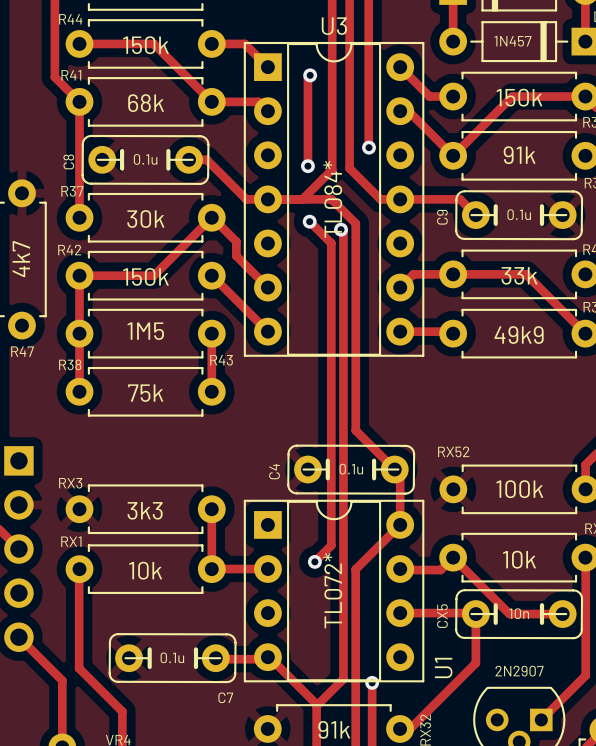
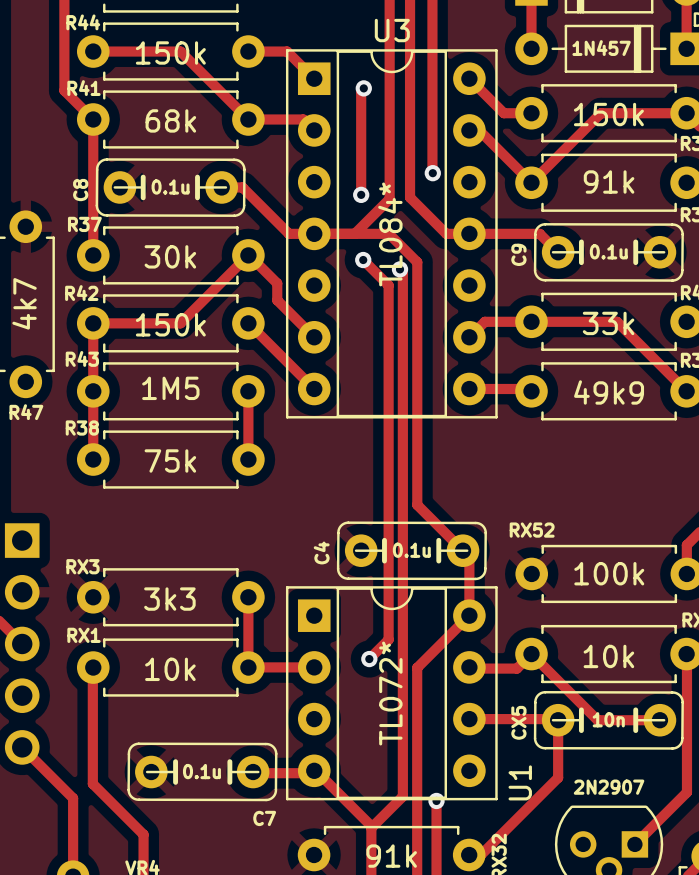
R43 name position: R43 (221, 360) -> R43 (82, 358)

